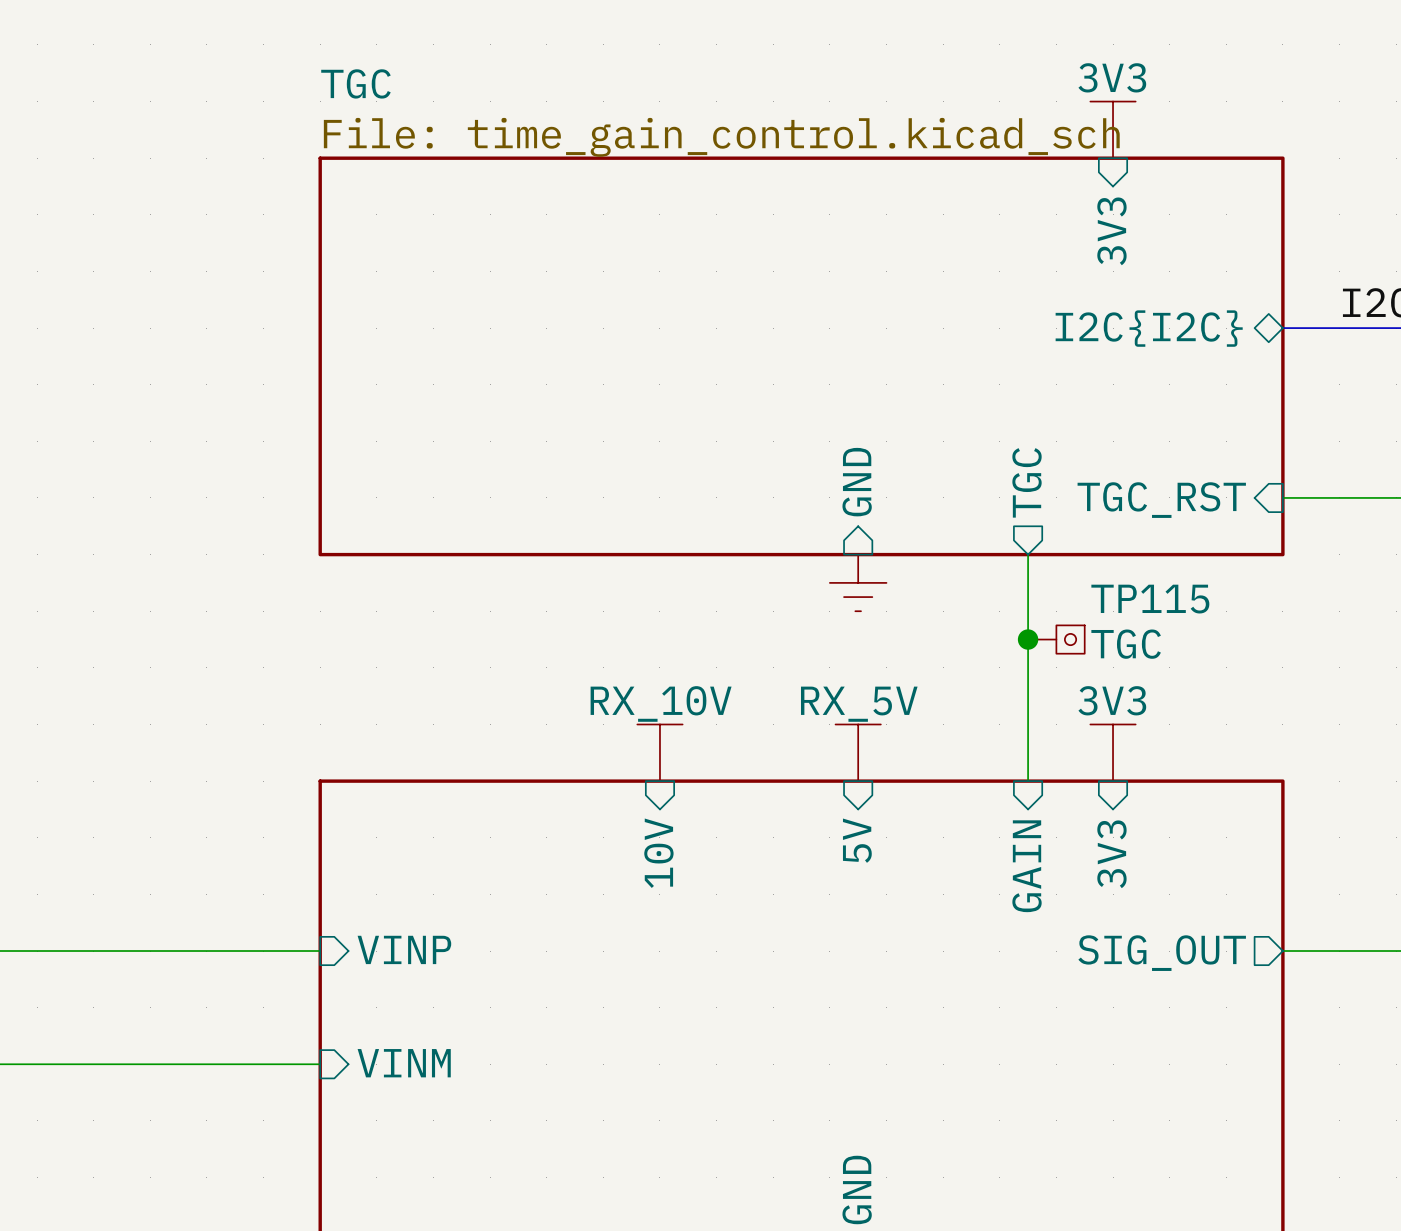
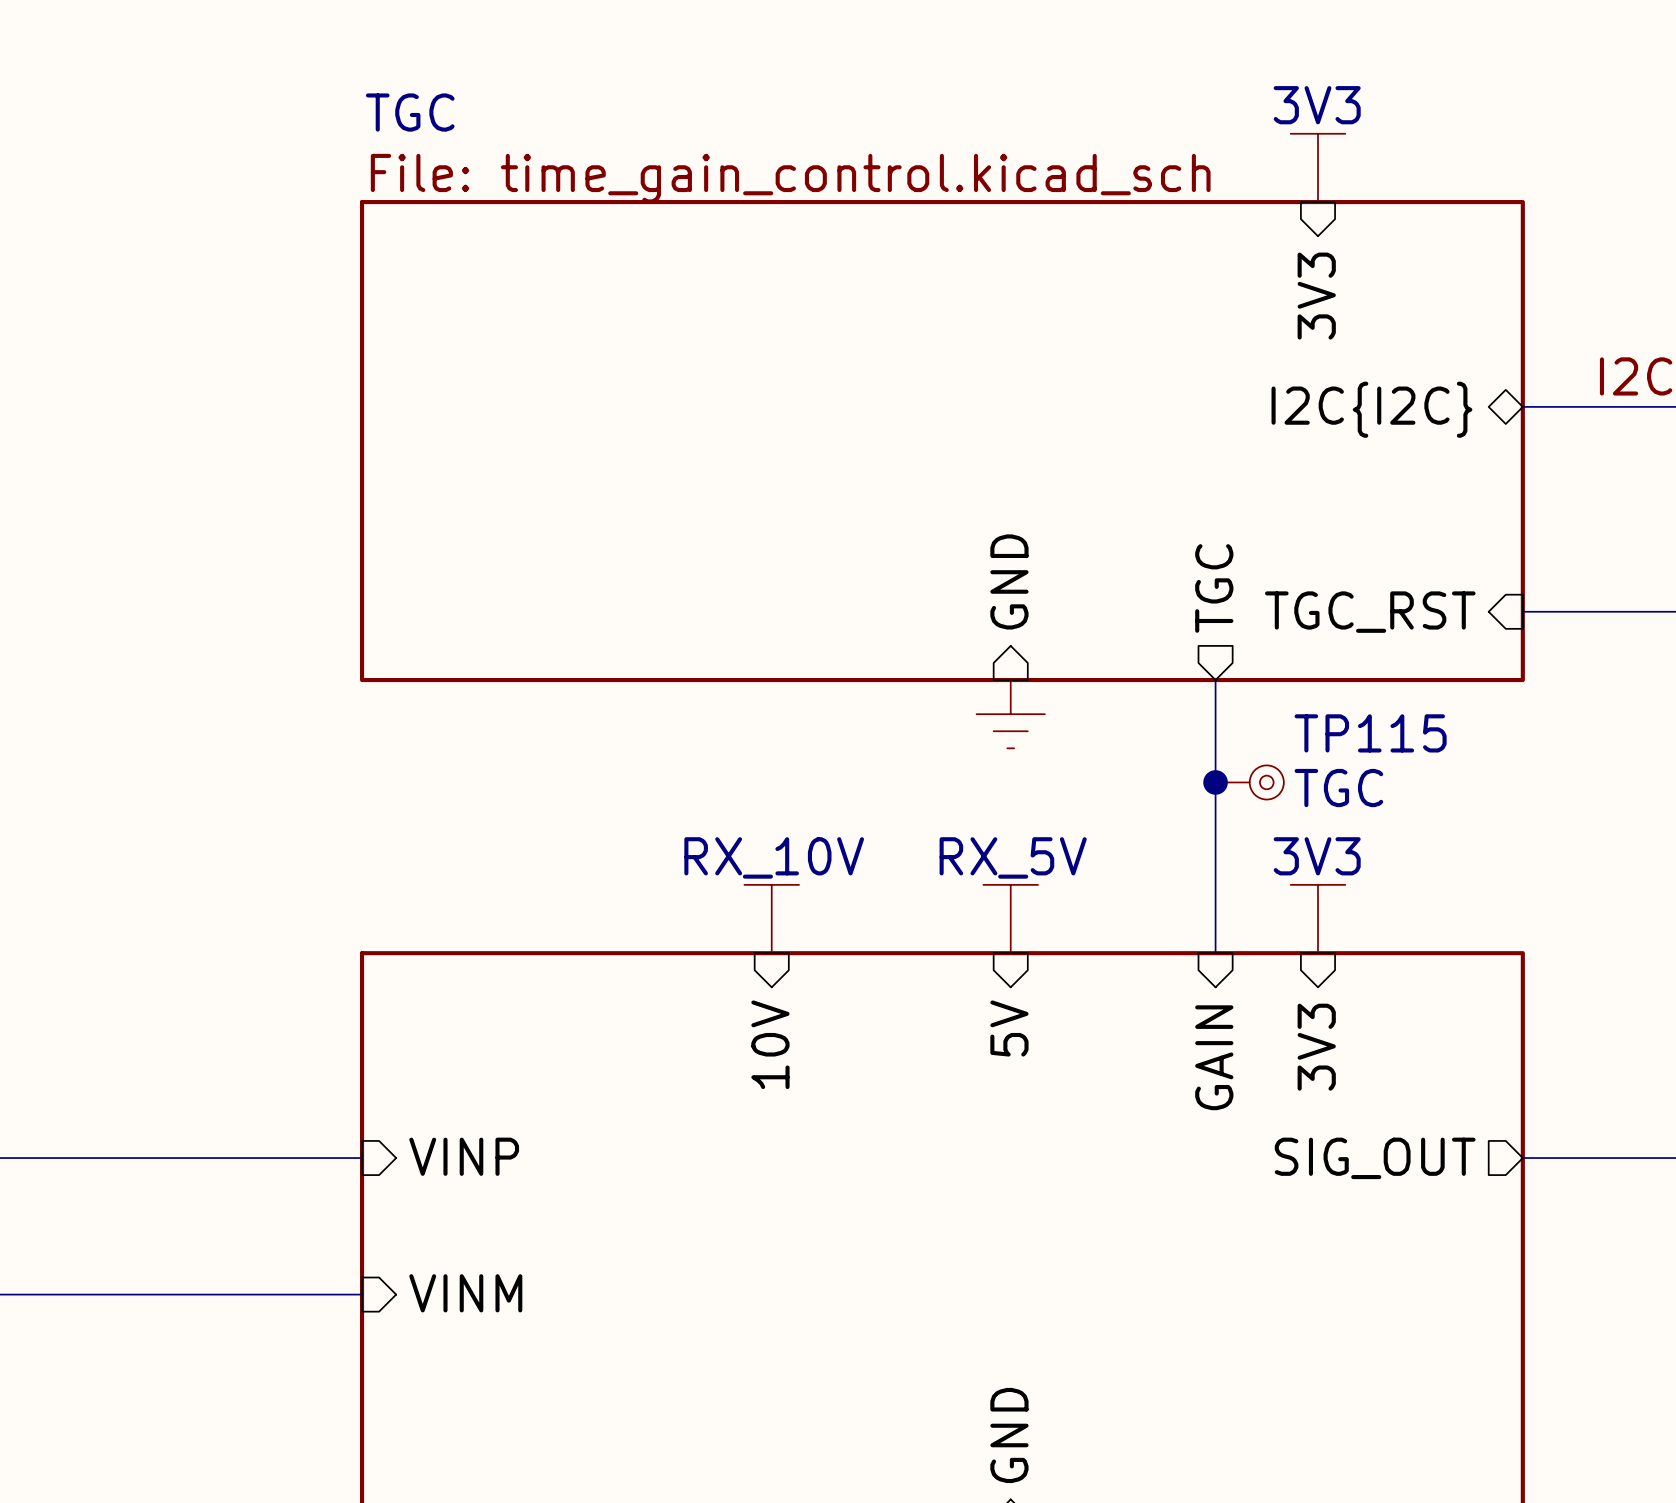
TP115 symbol: [1028, 625, 1085, 654] -> [1215, 765, 1284, 800]

